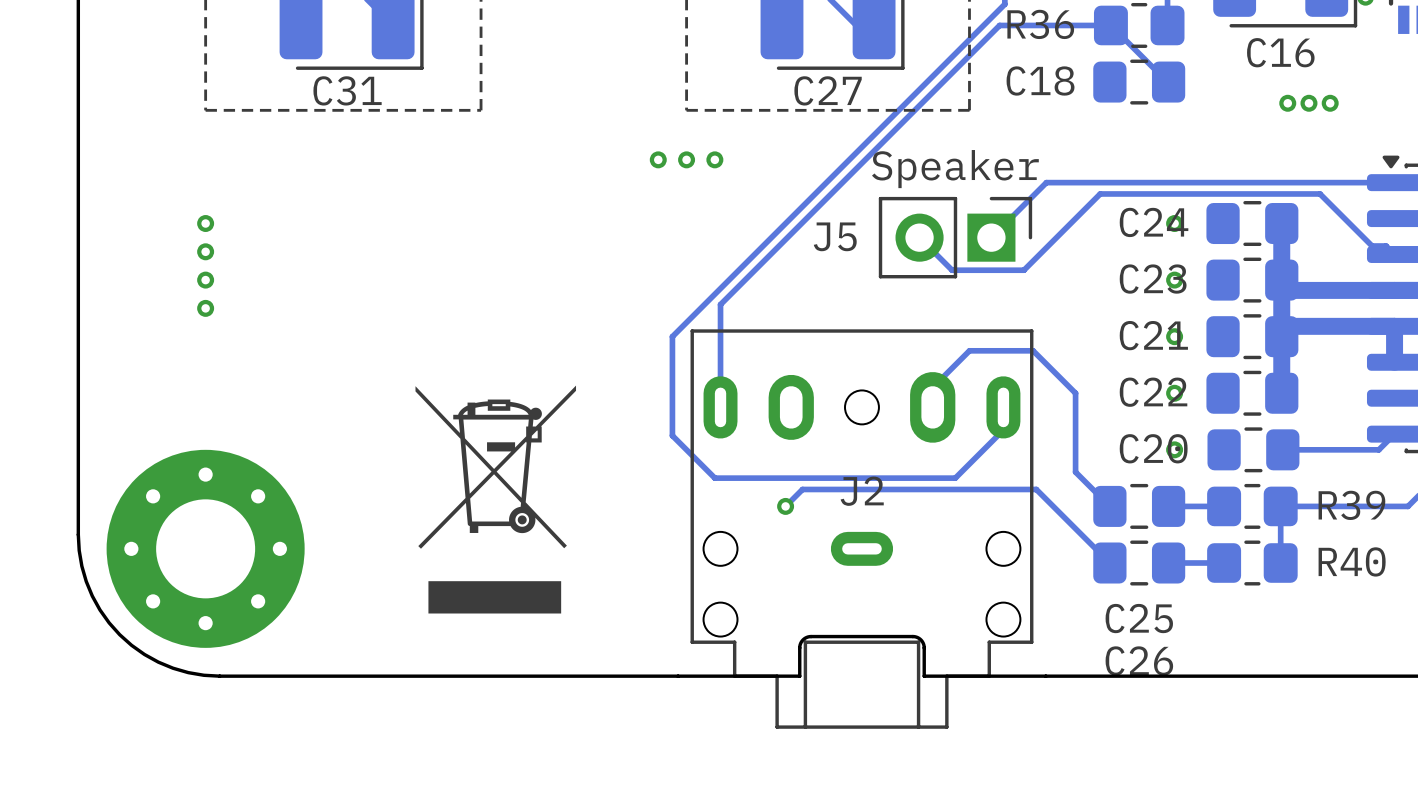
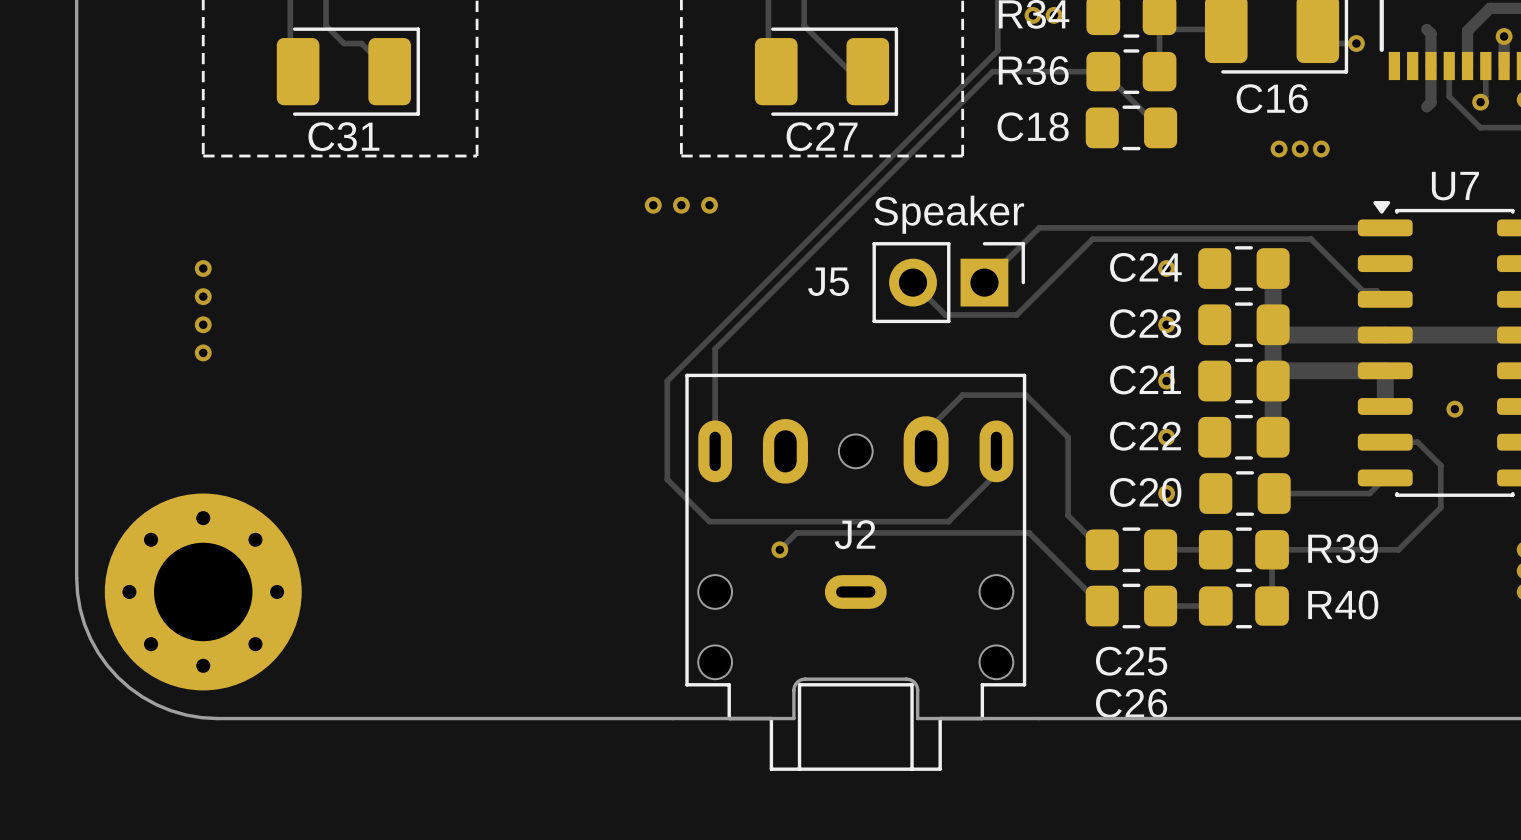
drawing: [415, 385, 577, 614] -> none

